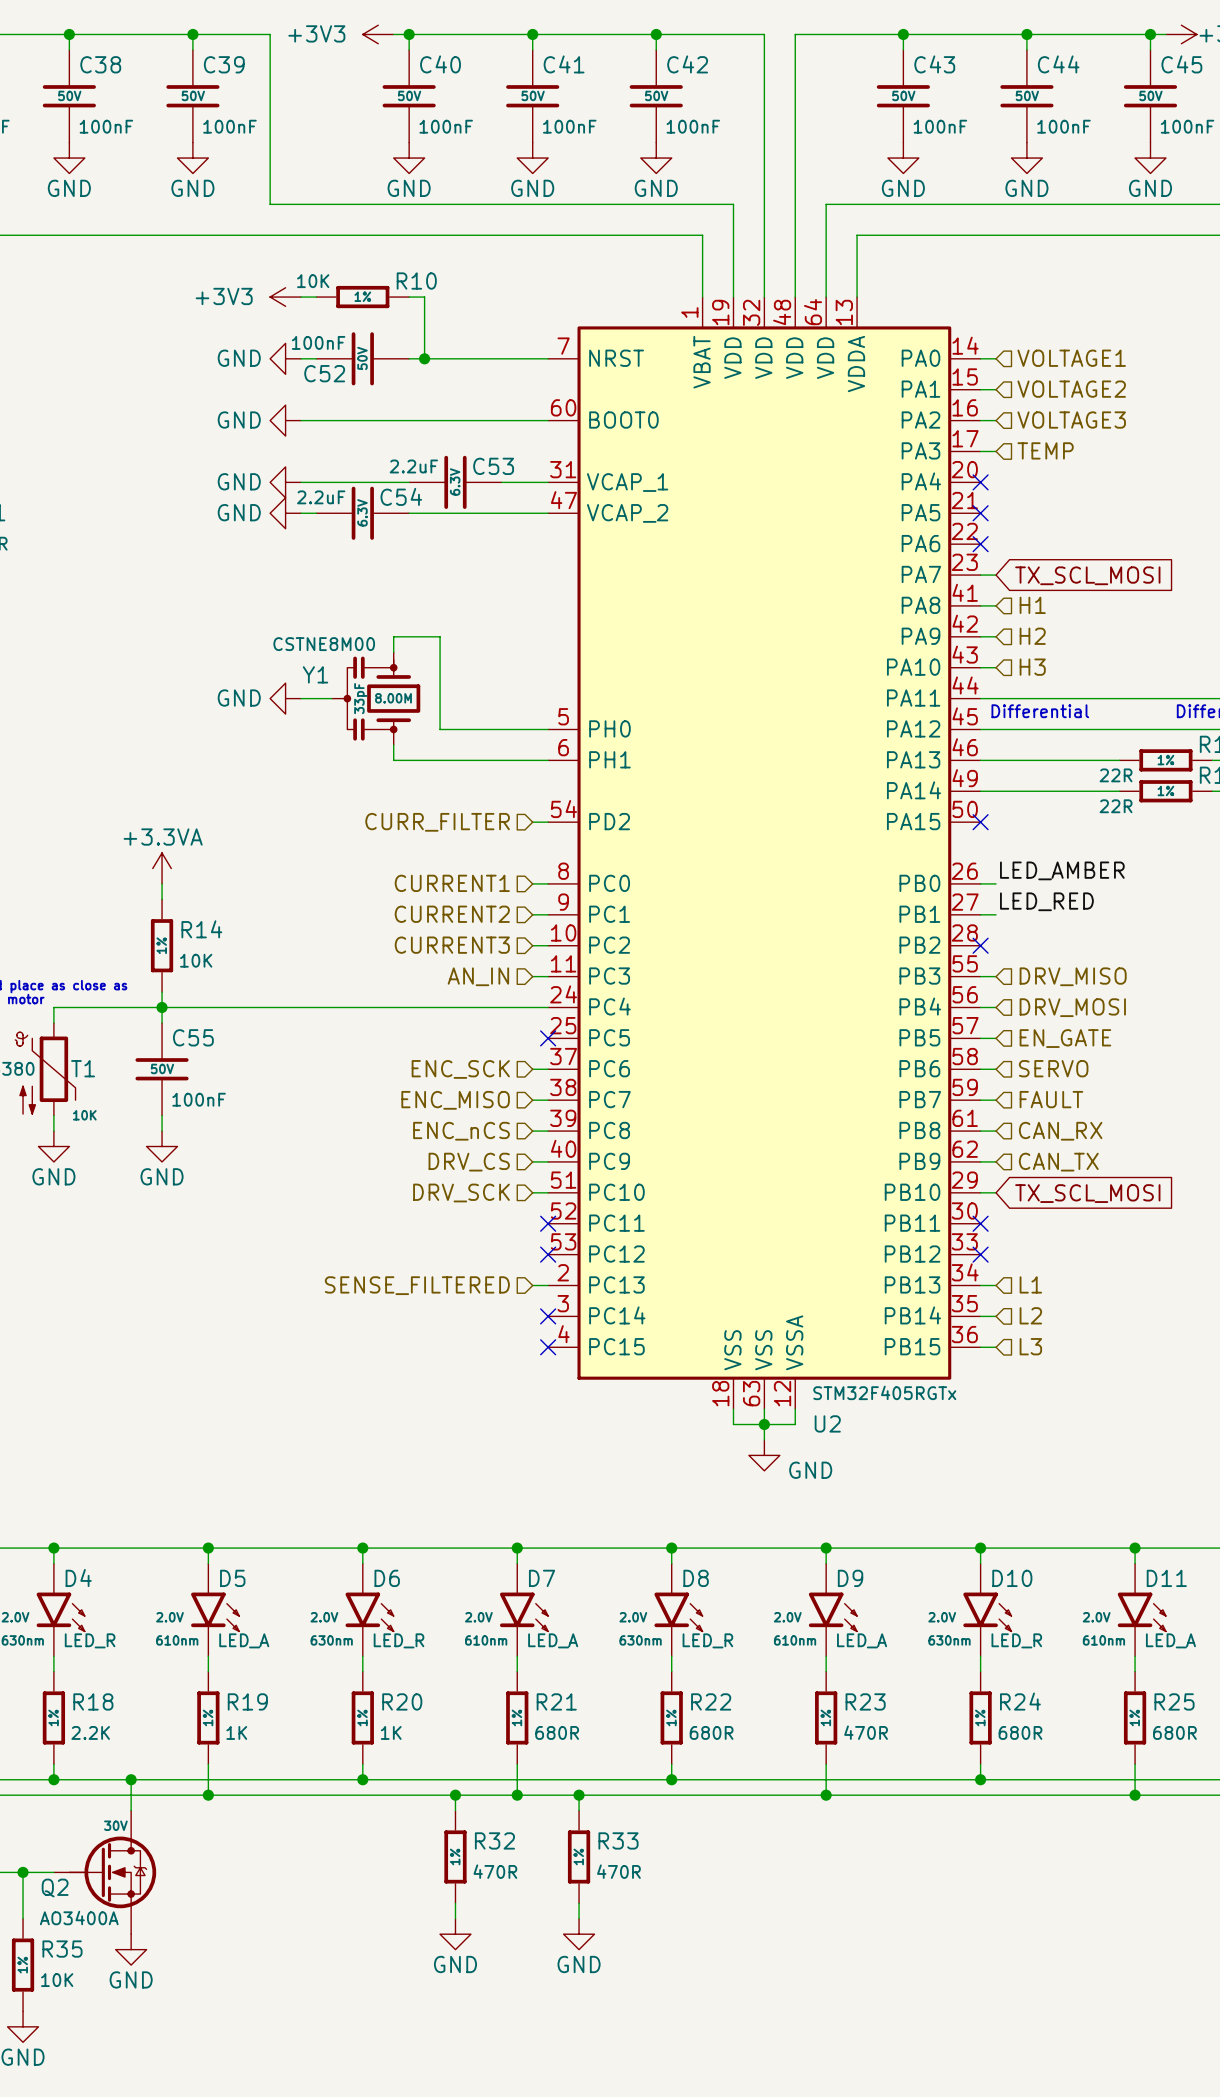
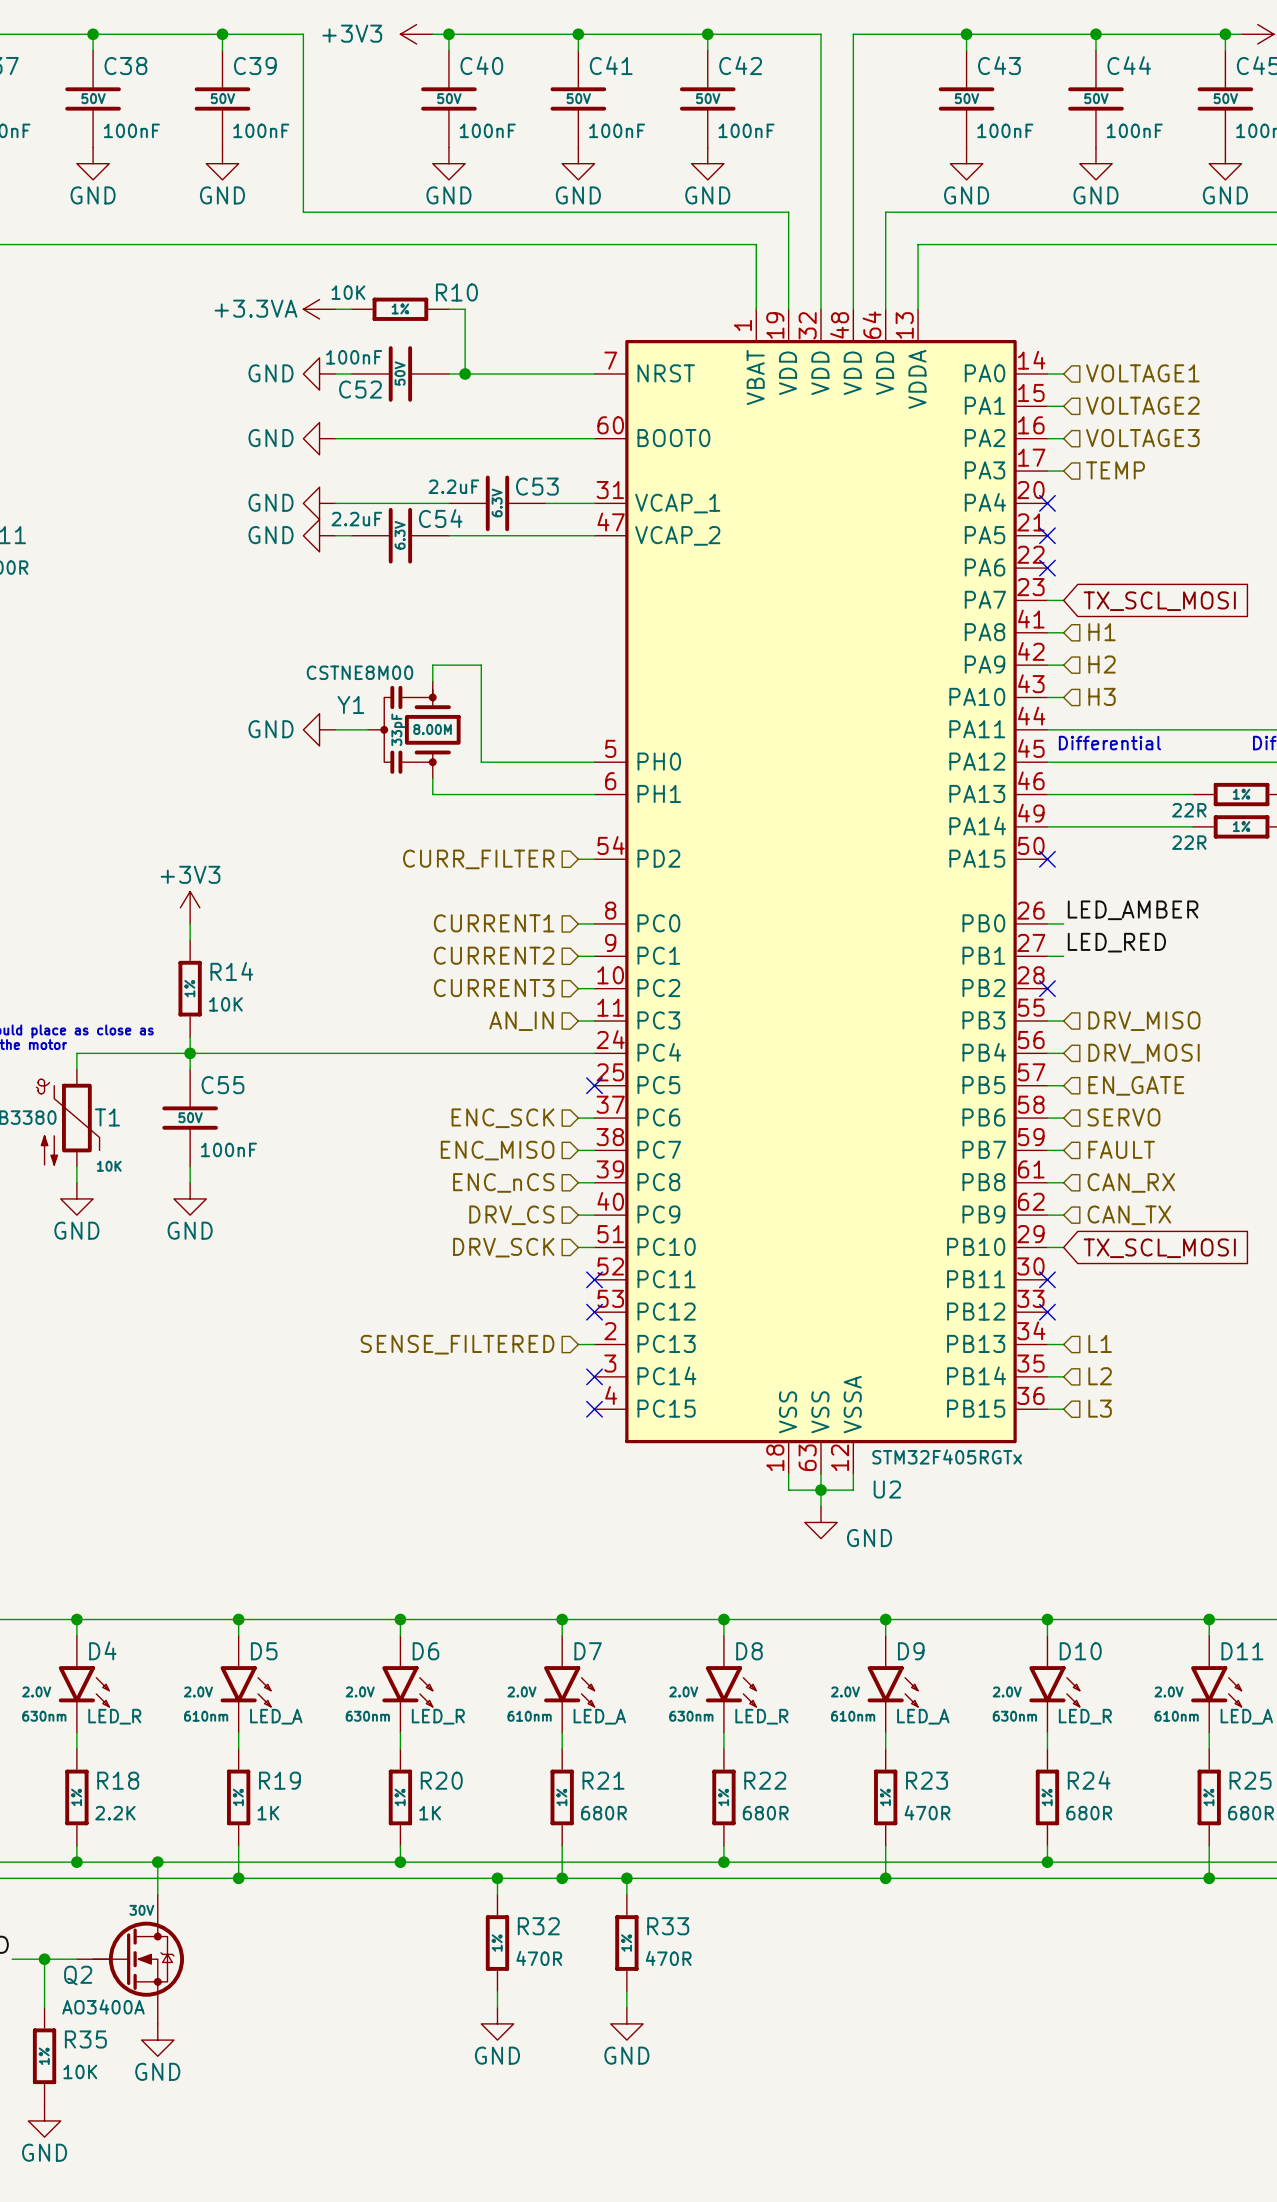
power symbol: +3V3 (285, 297) -> +3.3VA (319, 309)
power symbol: +3.3VA (162, 868) -> +3V3 (190, 907)

